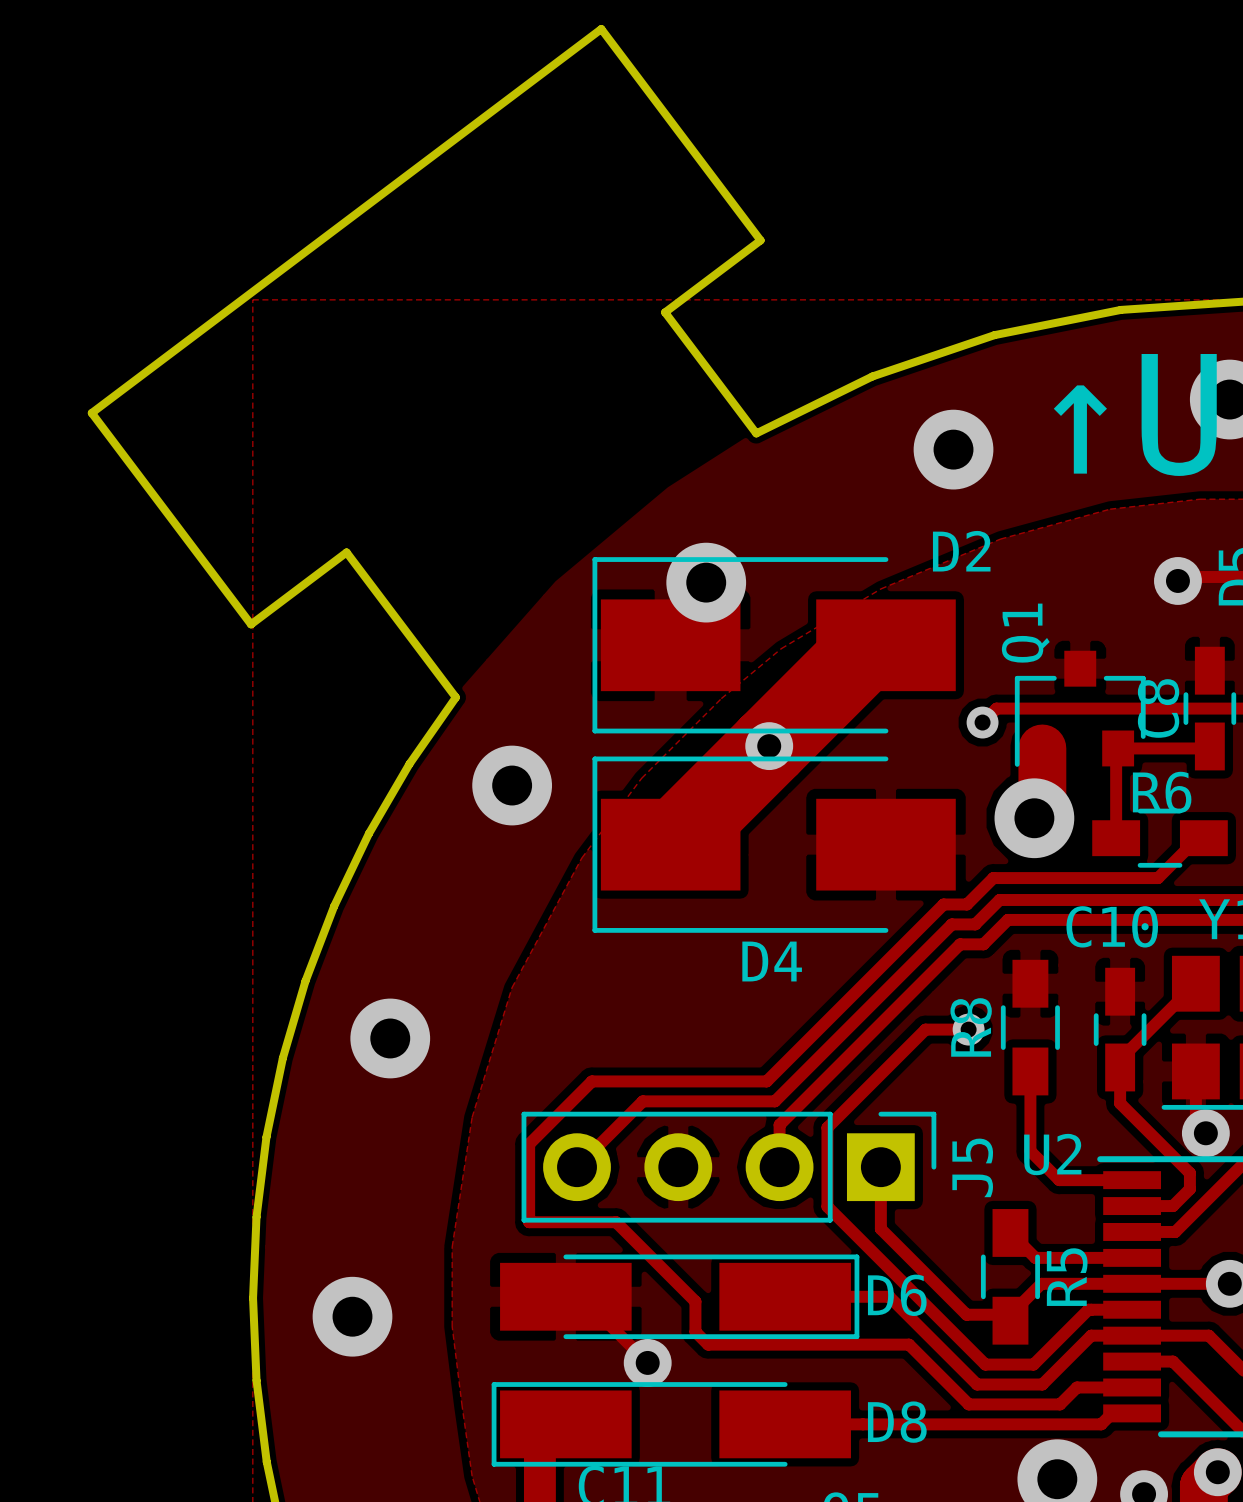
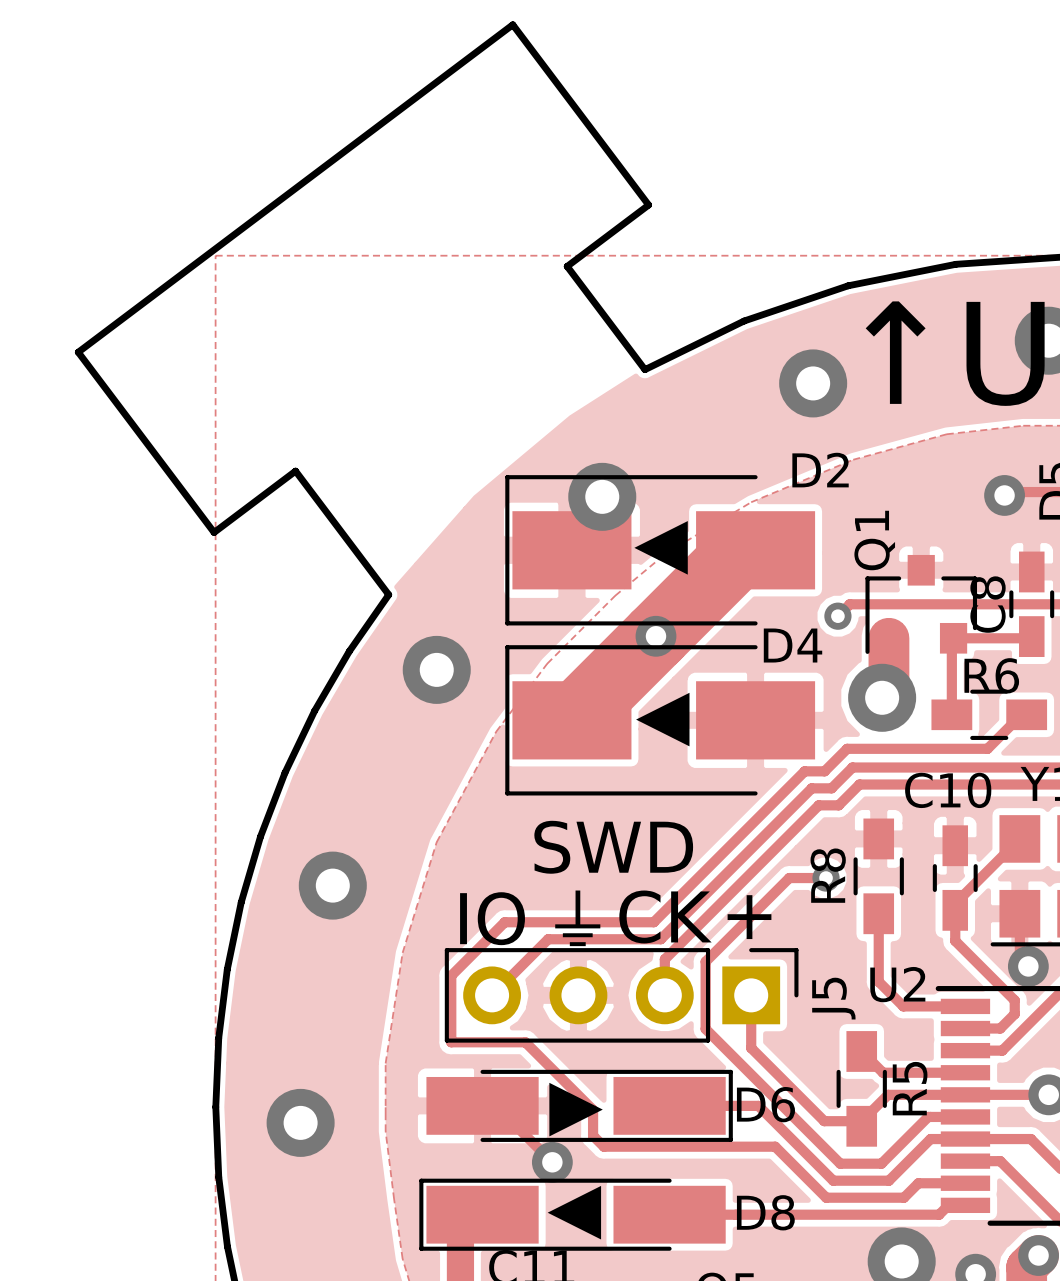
text: none -> ▶ (661, 547)
text: none -> ▶ (662, 719)
D4 name position: D4 (772, 961) -> D4 (793, 645)
text: none -> SWD (613, 847)
text: none -> CK (665, 916)
text: none -> + (749, 917)
text: none -> ⏚ (577, 918)
text: none -> IO (492, 918)
text: none -> ▶ (576, 1109)
text: none -> ▶ (574, 1212)

